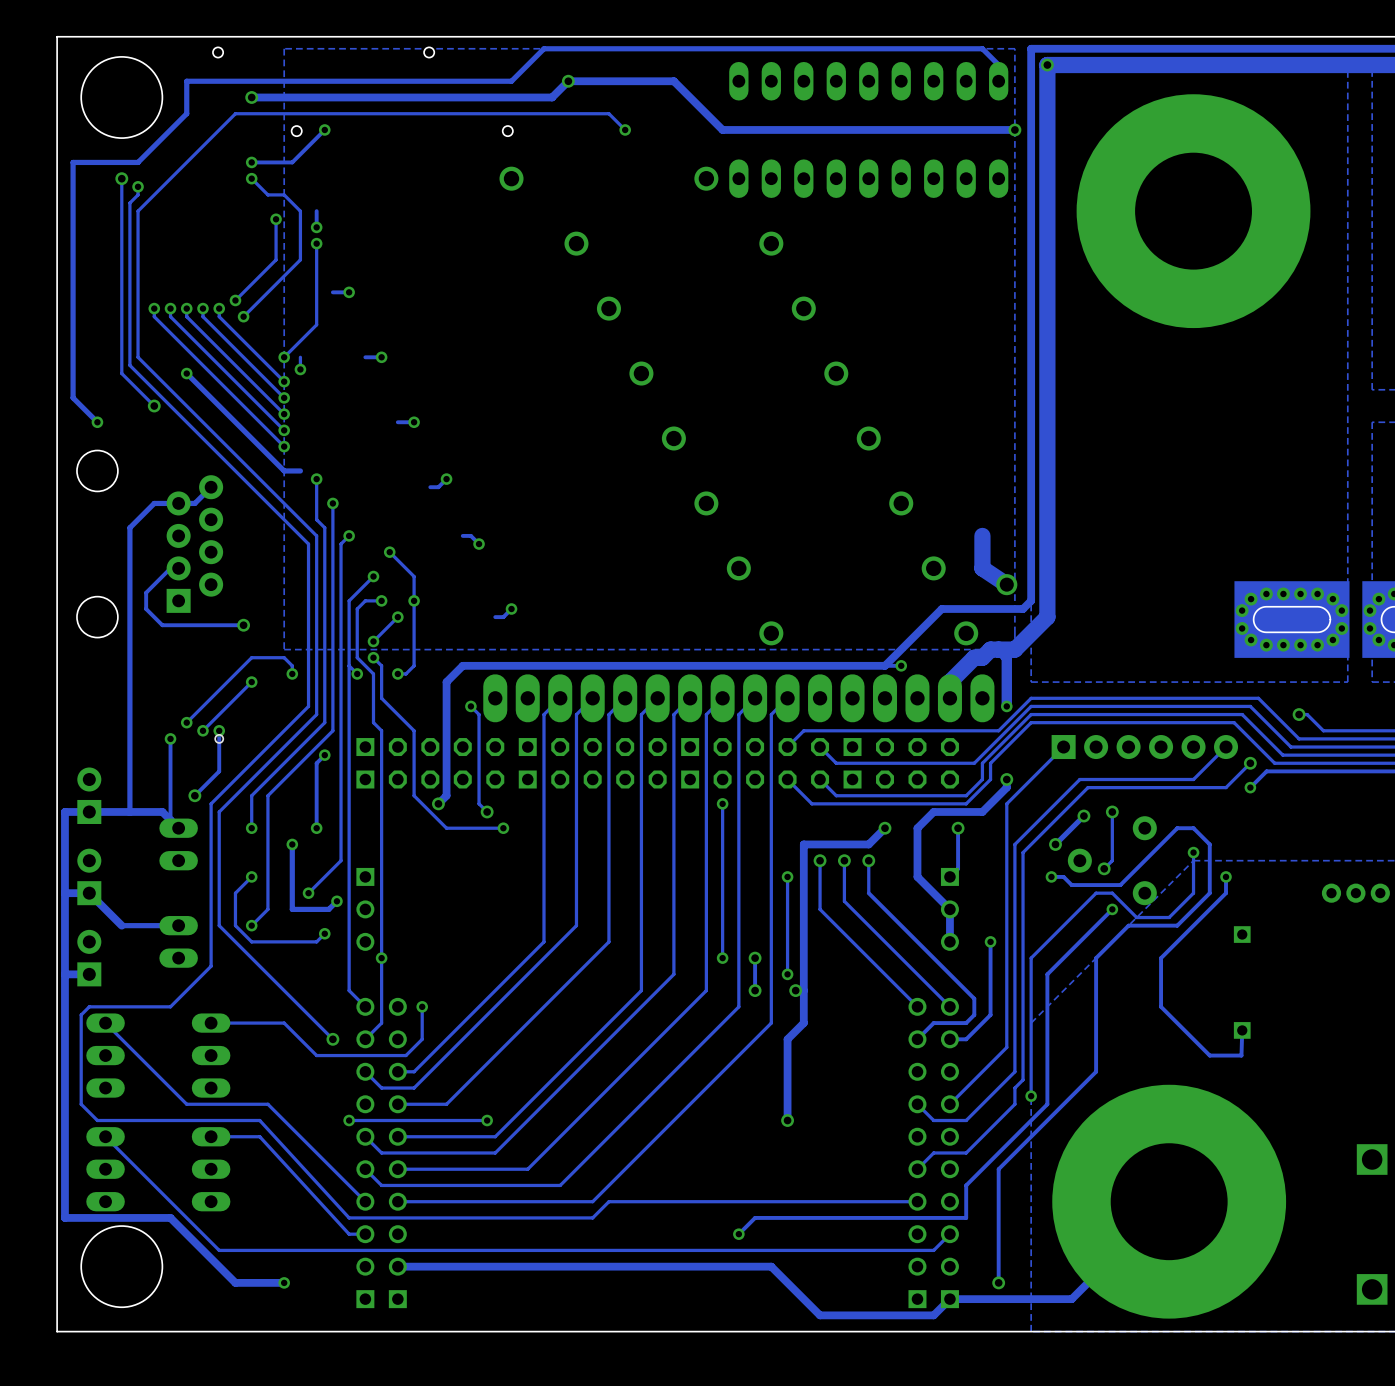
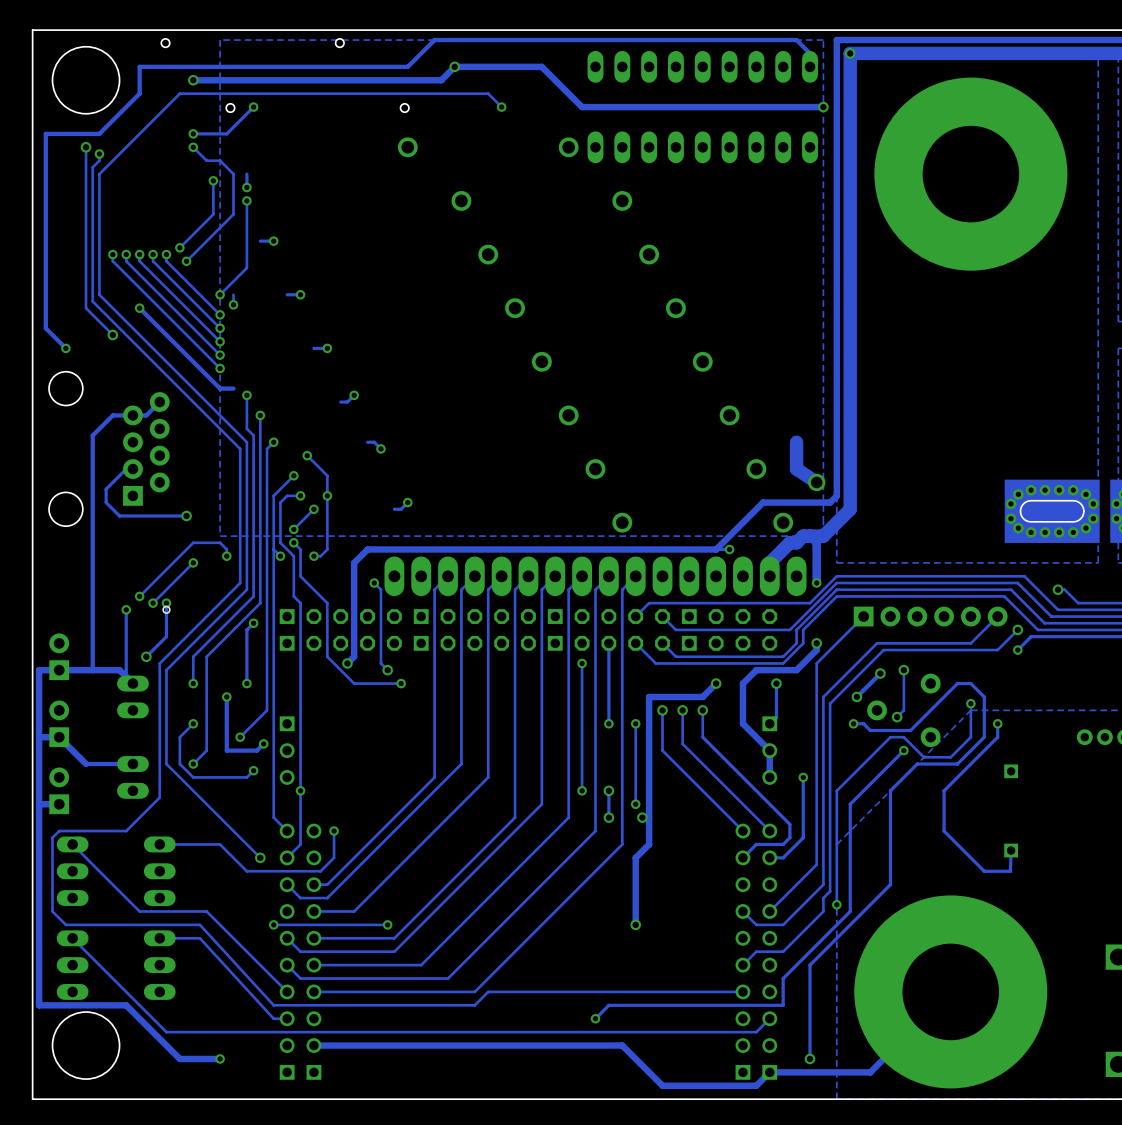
track: none -> (608, 643) (608, 723)
via: none -> (608, 723)

